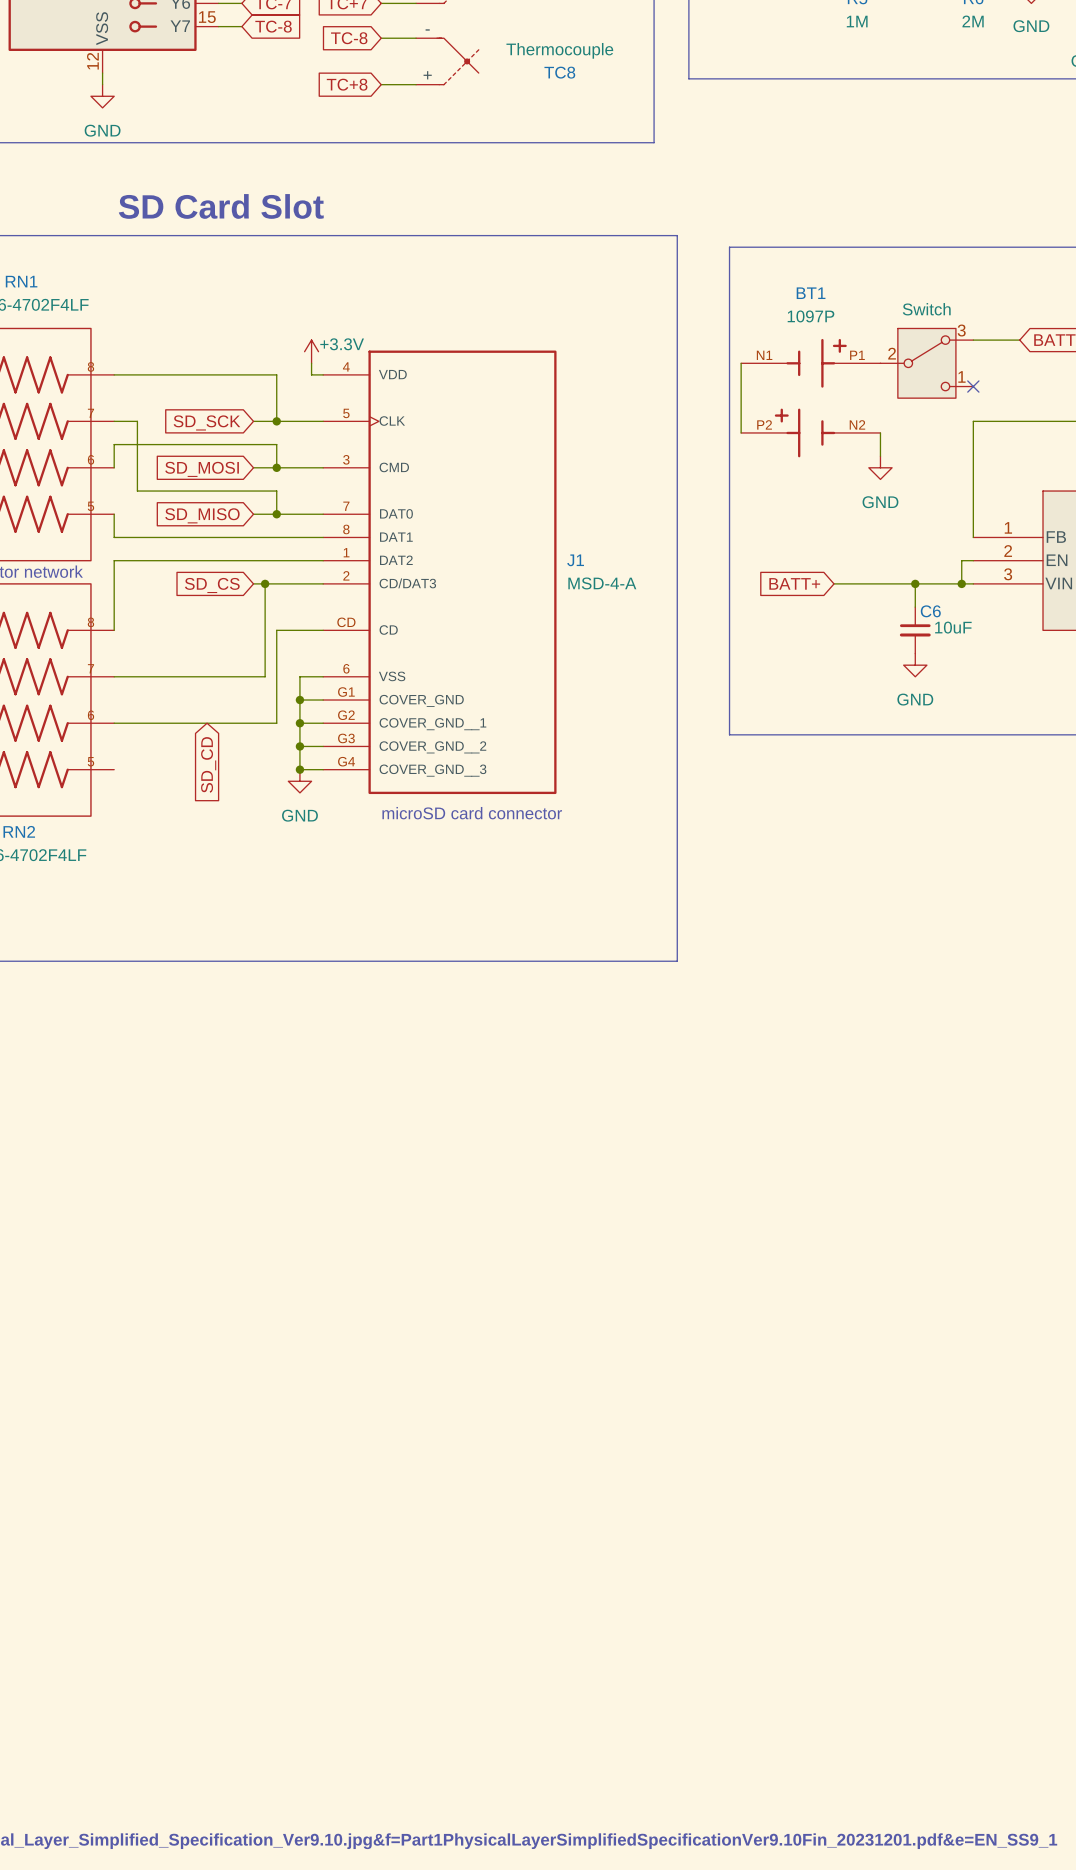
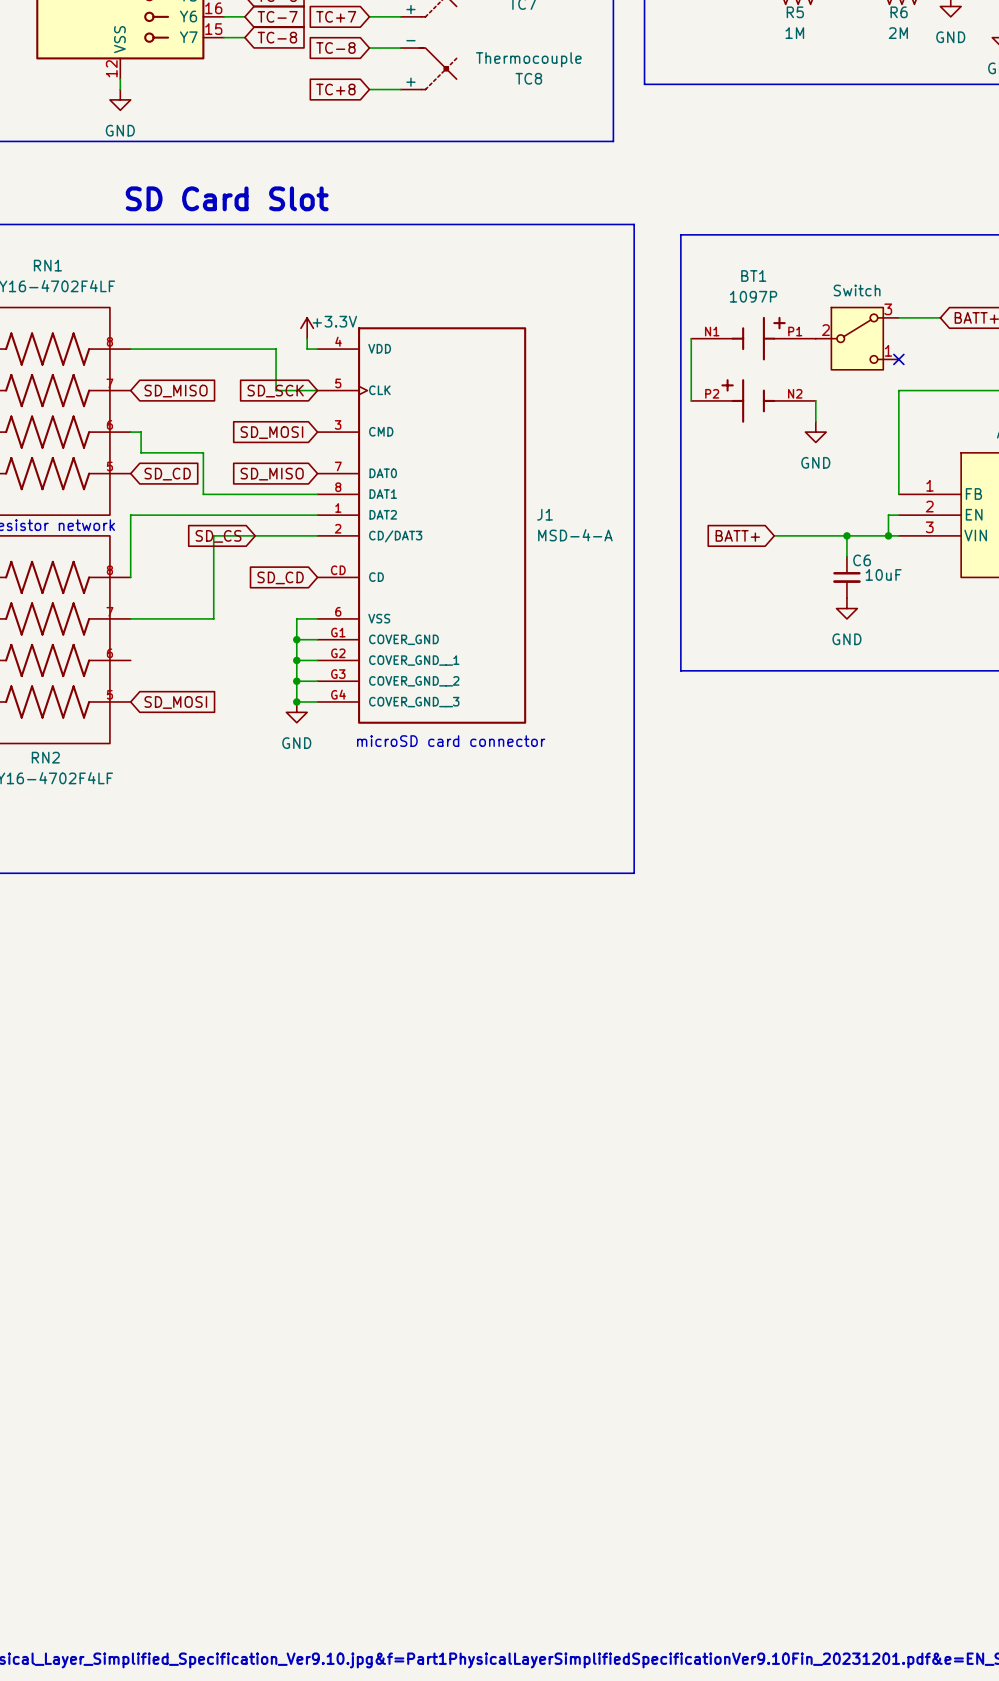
wire: (114, 421) (137, 421) (137, 491) -> (130, 432) (141, 432) (141, 452) (151, 452)
wire: (253, 421) (276, 421) -> none
junction: (276, 421) -> none
global label: none -> SD_MISO (176, 391)
global label position: SD_SCK (206, 422) -> SD_SCK (275, 391)
wire: (114, 467) (114, 444) (276, 444) (276, 467) -> none
wire: (253, 467) (323, 467) -> none
junction: (276, 467) -> none
global label position: SD_MOSI (202, 469) -> SD_MOSI (271, 432)
wire: (195, 491) (276, 491) (276, 514) -> (203, 452) (203, 494)
wire: (114, 514) (114, 537) (195, 537) -> none
wire: (253, 514) (323, 514) -> none
junction: (276, 514) -> none
global label: none -> SD_CD (167, 474)
global label position: SD_MISO (202, 515) -> SD_MISO (272, 474)
wire: (265, 583) (265, 676) (207, 676) -> (255, 535) (213, 535) (213, 618)
junction: (265, 583) -> none
wire: (323, 630) (276, 630) (276, 723) (114, 723) -> none
global label: none -> SD_CD (280, 577)
global label: SD_CD (208, 764) -> none
global label: none -> SD_MOSI (175, 702)

